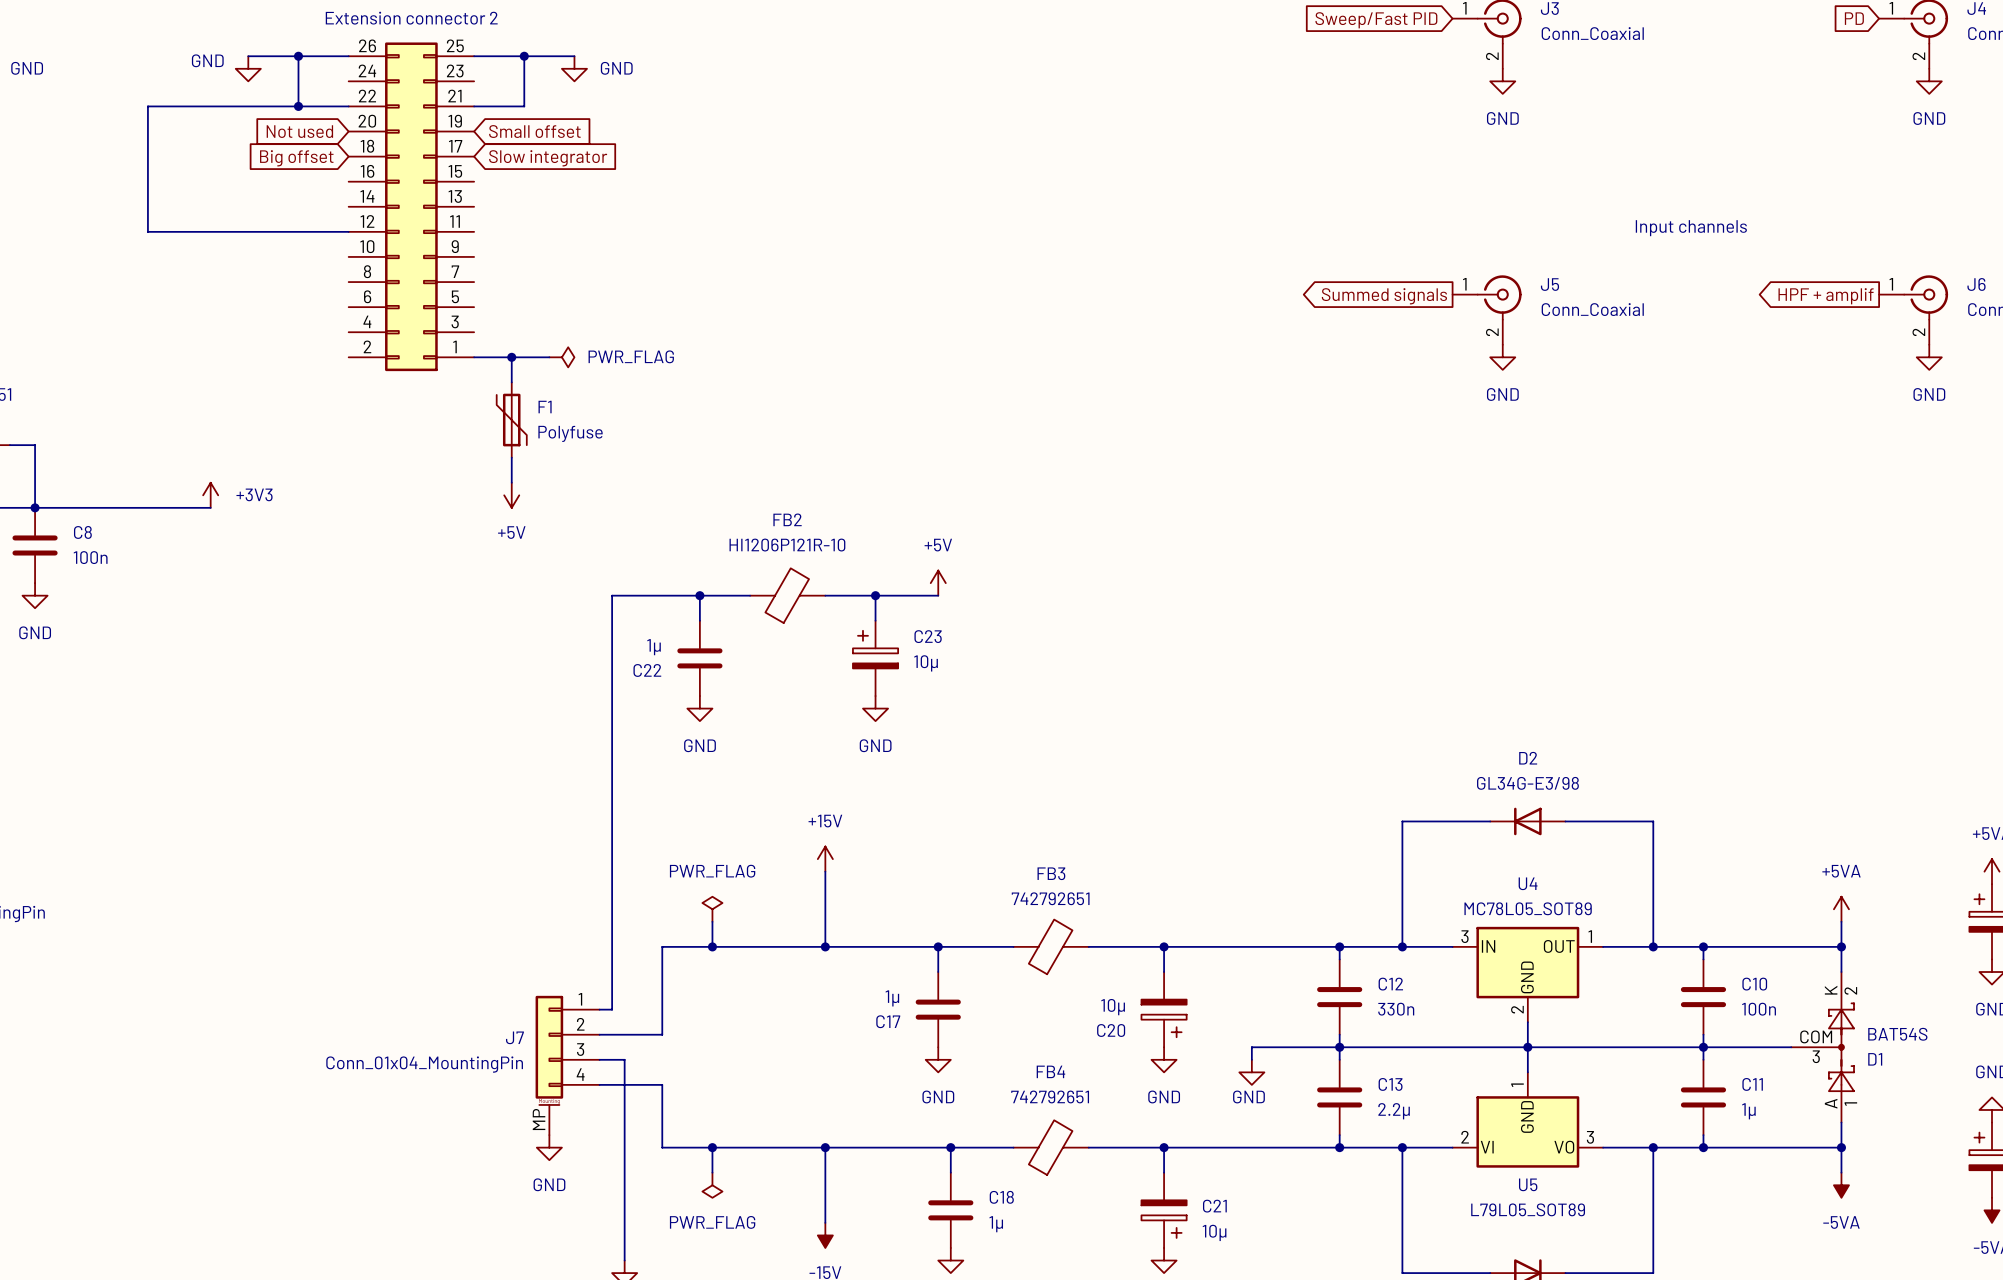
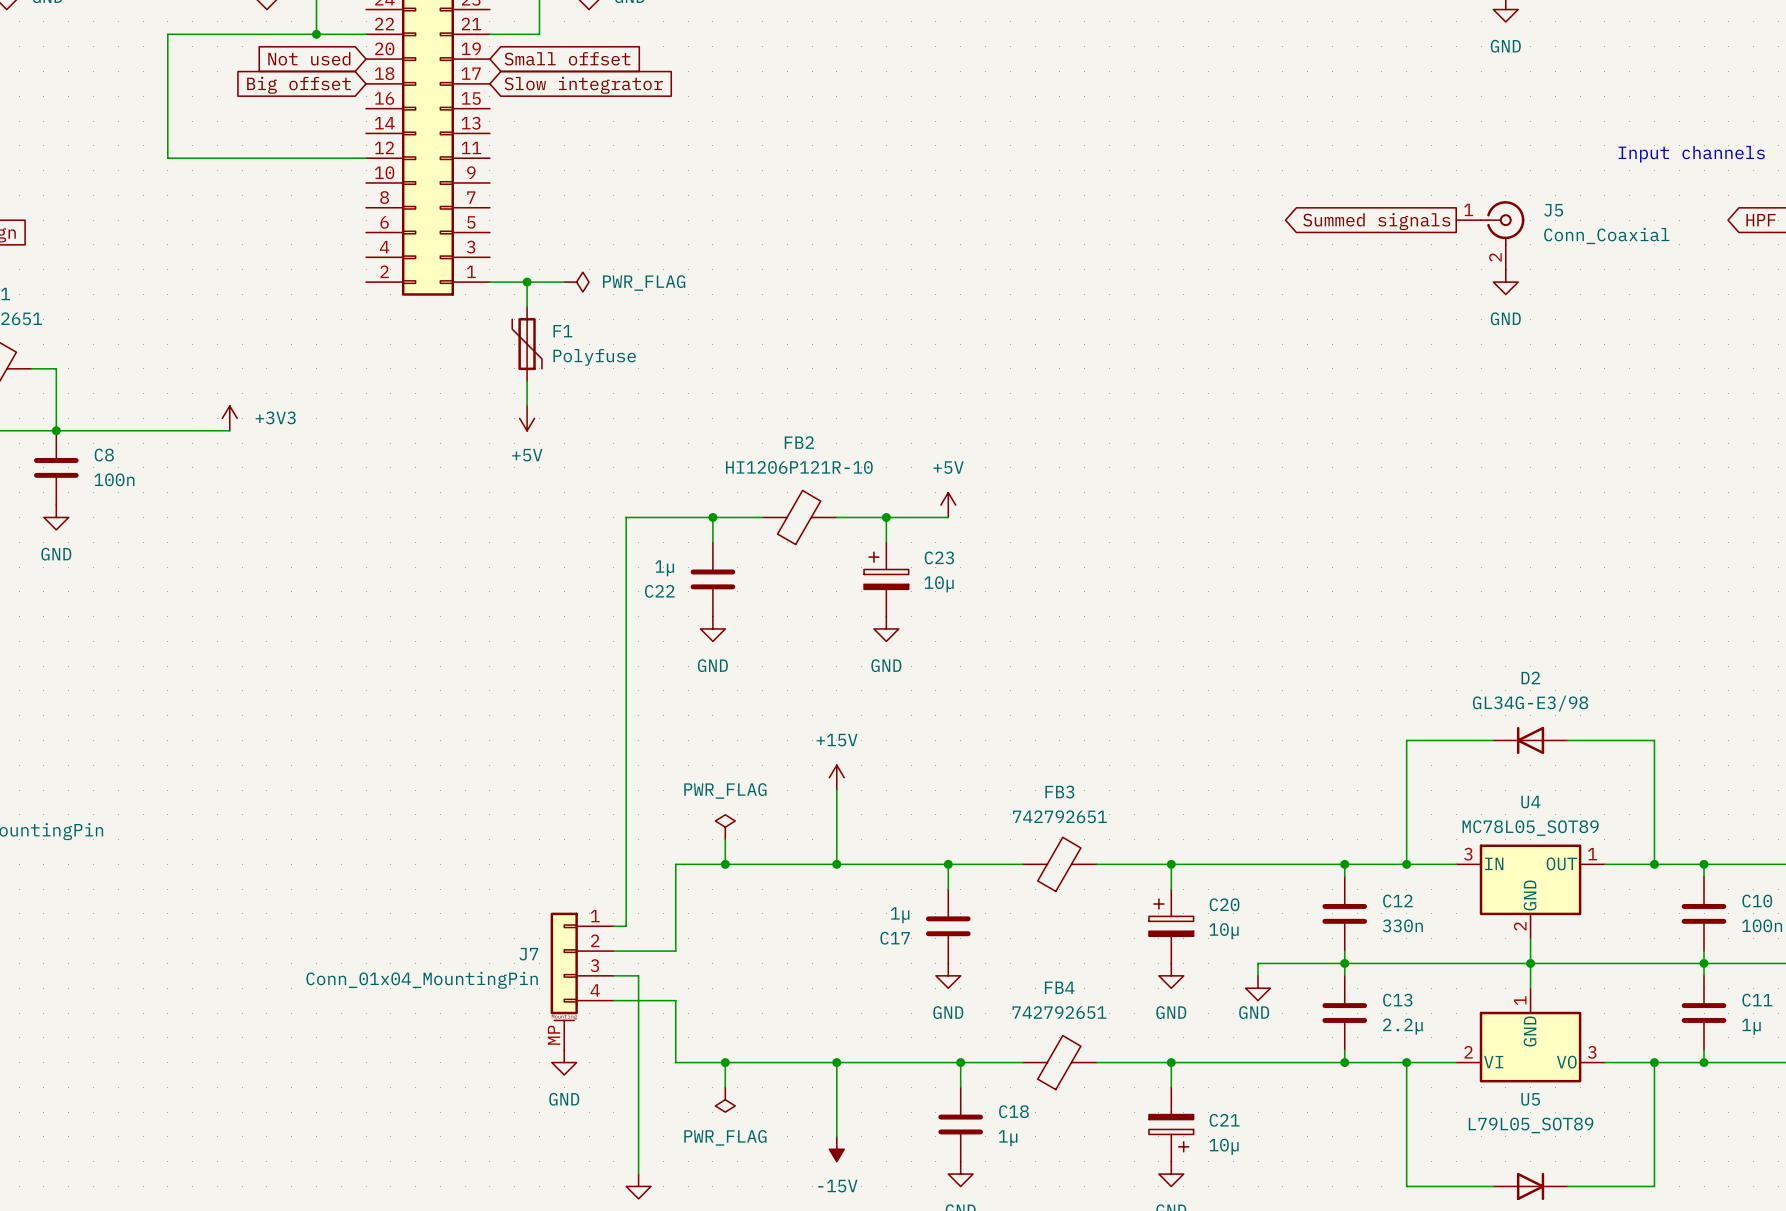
C20 rotation: 0° (1164, 1018) -> 180° (1171, 917)

